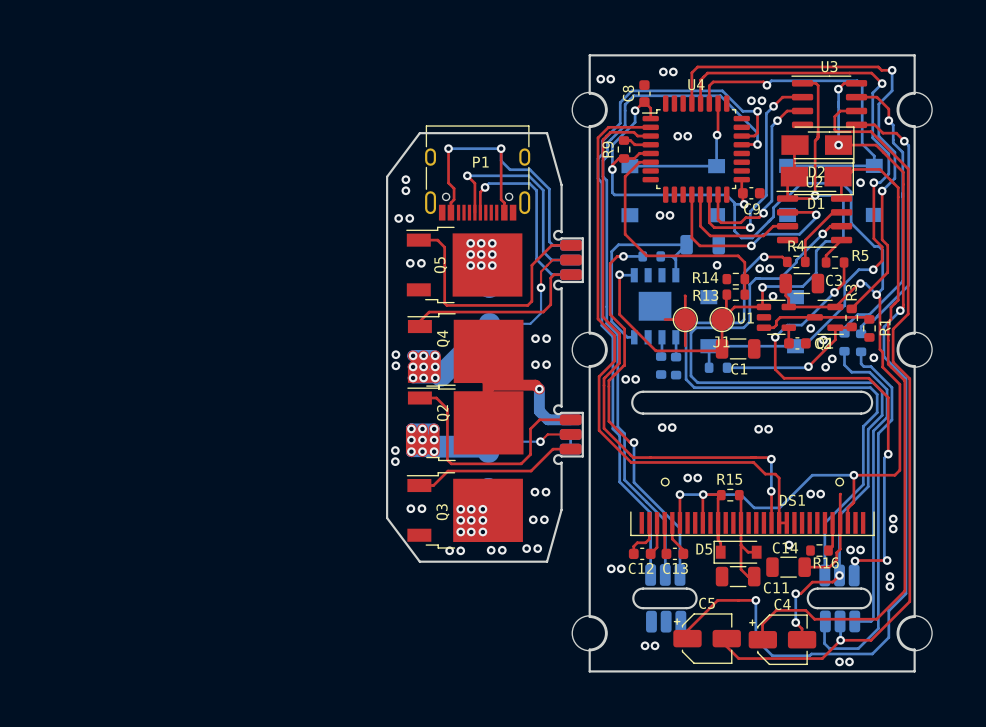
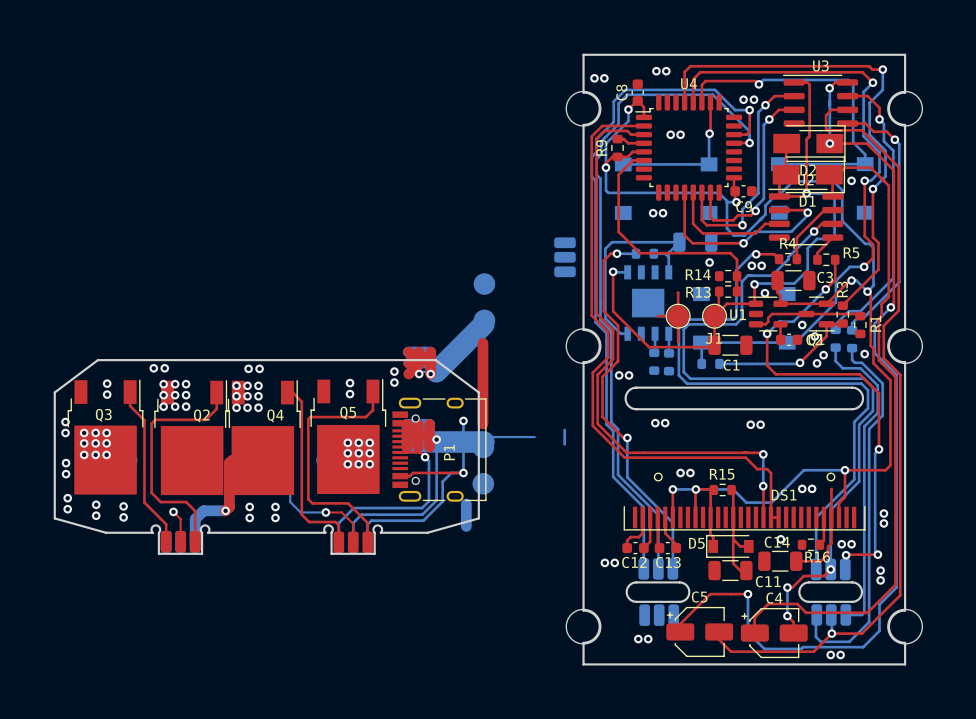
board edge: (419, 133) (387, 176) (387, 518) (419, 561) (547, 561) (561, 509) (561, 462) (556, 463) (554, 457) (558, 455) (582, 456) (582, 412) (558, 414) (554, 409) (557, 405) (561, 406) (561, 288) (556, 288) (554, 284) (558, 280) (582, 281) (582, 238) (558, 239) (554, 236) (556, 231) (561, 232) (561, 184) (547, 133) (419, 133) -> none
top track: (448, 148) (448, 183) (454, 188) (450, 212) -> none
bottom track: (448, 148) (501, 148) (501, 160) (510, 169) (529, 169) (549, 189) (549, 241) (553, 245) (570, 245) -> none
via: (448, 148) -> none
top track: (501, 148) (501, 199) (504, 202) (504, 212) -> none
via: (501, 148) -> none
P1 rotation: 0° (477, 172) -> 90° clockwise (439, 449)
P1 position: (477, 172) -> (439, 449)
top track: (467, 175) (474, 183) (474, 212) -> none
bottom track: (467, 175) (528, 175) (543, 190) (543, 251) (551, 260) (570, 260) -> none
via: (467, 175) -> none
via: (405, 179) -> none
top track: (485, 187) (480, 192) (480, 212) -> none
bottom track: (485, 187) (488, 183) (529, 183) (536, 190) (536, 259) (551, 274) (570, 274) -> none
via: (485, 187) -> none
via: (405, 190) -> none
via: (398, 218) -> none
via: (409, 218) -> none
top track: (418, 240) (437, 240) (444, 247) (444, 303) (446, 305) (527, 305) (531, 301) (531, 265) (551, 245) (571, 245) -> none
via: (470, 243) -> none
via: (481, 243) -> none
via: (492, 243) -> none
via: (470, 254) -> none
via: (481, 254) -> none
via: (492, 254) -> none
top track: (571, 260) (552, 260) (541, 271) (541, 287) -> none
part: (571, 260) -> none
via: (410, 263) -> none
via: (421, 263) -> none
Q5 rotation: 0° (464, 264) -> 90° clockwise (348, 436)
Q5 position: (464, 264) -> (348, 436)
via: (470, 265) -> none
via: (481, 265) -> none
via: (492, 265) -> none
top track: (571, 274) (554, 274) (550, 278) (550, 304) (543, 312) (429, 312) (419, 321) (419, 326) -> none
bottom track: (541, 287) (541, 313) (530, 323) (489, 323) -> none
via: (541, 287) -> none
via: (535, 338) -> none
via: (546, 338) -> none
Q4 rotation: 0° (465, 351) -> 90° clockwise (262, 437)
Q4 position: (465, 351) -> (262, 437)
via: (395, 354) -> none
via: (413, 355) -> none
via: (423, 355) -> none
via: (435, 355) -> none
board edge: none -> (97, 360) (435, 360) (478, 392) (478, 518) (427, 532) (380, 532) (381, 527) (376, 525) (373, 529) (374, 553) (331, 553) (332, 529) (328, 525) (324, 528) (325, 532) (208, 532) (208, 527) (204, 525) (200, 529) (202, 553) (158, 553) (160, 529) (157, 525) (152, 527) (152, 532) (106, 532) (54, 518) (54, 392) (97, 360)
via: (535, 364) -> none
via: (546, 364) -> none
via: (395, 365) -> none
via: (413, 366) -> none
via: (423, 366) -> none
via: (435, 366) -> none
via: none -> (153, 368)
via: none -> (164, 368)
via: none -> (248, 368)
via: none -> (259, 368)
via: none -> (394, 371)
via: (413, 377) -> none
top track: (488, 382) (491, 385) (535, 385) (539, 389) -> none
via: none -> (394, 382)
via: none -> (107, 383)
via: none -> (350, 383)
via: none -> (163, 384)
via: none -> (175, 384)
via: none -> (186, 384)
via: none -> (236, 385)
via: none -> (247, 385)
via: none -> (258, 385)
bottom track: (539, 389) (539, 411) (547, 419) (570, 419) -> none
via: (539, 389) -> none
top track: none -> (372, 391) (372, 410) (365, 417) (310, 417) (308, 419) (308, 499) (312, 503) (348, 503) (367, 523) (367, 542)
top track: none -> (130, 392) (130, 406) (144, 420) (144, 502) (166, 524) (166, 541)
top track: none -> (216, 392) (216, 408) (205, 419) (155, 419) (151, 423) (151, 492) (160, 502) (186, 502) (195, 511) (195, 541)
top track: none -> (287, 392) (292, 392) (301, 401) (301, 514) (309, 522) (335, 522) (338, 525) (338, 542)
top track: (419, 397) (436, 397) (447, 409) (447, 459) (451, 463) (521, 463) (530, 454) (530, 428) (539, 419) (570, 419) -> none
via: none -> (107, 394)
via: none -> (350, 394)
via: none -> (163, 395)
via: none -> (175, 395)
via: none -> (186, 395)
via: none -> (236, 396)
via: none -> (247, 396)
via: none -> (258, 396)
via: none -> (163, 406)
via: none -> (175, 406)
via: none -> (186, 406)
via: none -> (236, 407)
via: none -> (247, 407)
via: none -> (258, 407)
Q2 rotation: 0° (465, 422) -> 90° clockwise (192, 437)
Q2 position: (465, 422) -> (192, 437)
bottom track: none -> (463, 420) (463, 472) (451, 472) (442, 481) (442, 501) (423, 520) (371, 520) (367, 524) (367, 542)
via: none -> (463, 420)
via: none -> (65, 422)
via: (411, 428) -> none
via: (422, 428) -> none
via: (434, 428) -> none
top track: (570, 434) (547, 434) (540, 441) -> none
part: (570, 434) -> none
via: none -> (65, 432)
via: none -> (84, 432)
via: none -> (95, 432)
via: none -> (106, 432)
via: (411, 440) -> none
via: (422, 440) -> none
via: (434, 440) -> none
via: (540, 441) -> none
bottom track: none -> (436, 439) (436, 500) (422, 514) (361, 514) (353, 522) (353, 542)
via: none -> (436, 439)
via: none -> (347, 442)
via: none -> (358, 442)
via: none -> (369, 442)
via: none -> (84, 443)
via: none -> (95, 443)
via: none -> (106, 443)
top track: (570, 449) (552, 449) (531, 471) (447, 471) (433, 485) (419, 485) -> none
via: (395, 450) -> none
via: (411, 451) -> none
via: (422, 451) -> none
via: (434, 451) -> none
top track: none -> (400, 452) (420, 452) (425, 457)
via: none -> (347, 453)
via: none -> (358, 453)
via: none -> (369, 453)
via: none -> (84, 454)
via: none -> (95, 454)
via: none -> (106, 454)
via: (395, 461) -> none
bottom track: none -> (425, 457) (428, 460) (428, 501) (422, 508) (353, 508) (338, 523) (338, 542)
via: none -> (425, 457)
top track: none -> (232, 460) (229, 463) (229, 506) (225, 510)
bottom track: none -> (290, 461) (290, 501) (300, 512) (325, 512)
via: none -> (66, 463)
via: none -> (347, 464)
via: none -> (358, 464)
via: none -> (369, 464)
top track: none -> (463, 472) (413, 472) (409, 476) (400, 476)
via: none -> (463, 472)
via: none -> (66, 474)
via: (534, 492) -> none
via: (546, 492) -> none
via: none -> (67, 498)
via: (410, 508) -> none
via: (421, 508) -> none
via: (460, 509) -> none
via: (471, 509) -> none
via: (482, 509) -> none
via: none -> (96, 504)
Q3 rotation: 0° (464, 510) -> 90° clockwise (105, 437)
Q3 position: (464, 510) -> (105, 437)
via: none -> (123, 506)
via: none -> (249, 506)
via: none -> (275, 506)
via: none -> (67, 509)
bottom track: none -> (225, 510) (203, 510) (195, 519) (195, 541)
via: none -> (225, 510)
top track: none -> (173, 511) (180, 519) (180, 541)
via: none -> (173, 511)
top track: none -> (325, 512) (341, 512) (353, 523) (353, 542)
via: none -> (325, 512)
via: (533, 519) -> none
via: (544, 519) -> none
via: (460, 520) -> none
via: (471, 520) -> none
via: (482, 520) -> none
via: none -> (96, 515)
via: none -> (123, 517)
via: none -> (249, 517)
via: none -> (275, 517)
via: (460, 531) -> none
via: (471, 531) -> none
via: (482, 531) -> none
part: none -> (180, 541)
part: none -> (353, 542)
via: (526, 548) -> none
via: (537, 548) -> none
via: (449, 550) -> none
via: (460, 550) -> none
via: (491, 550) -> none
via: (502, 550) -> none

